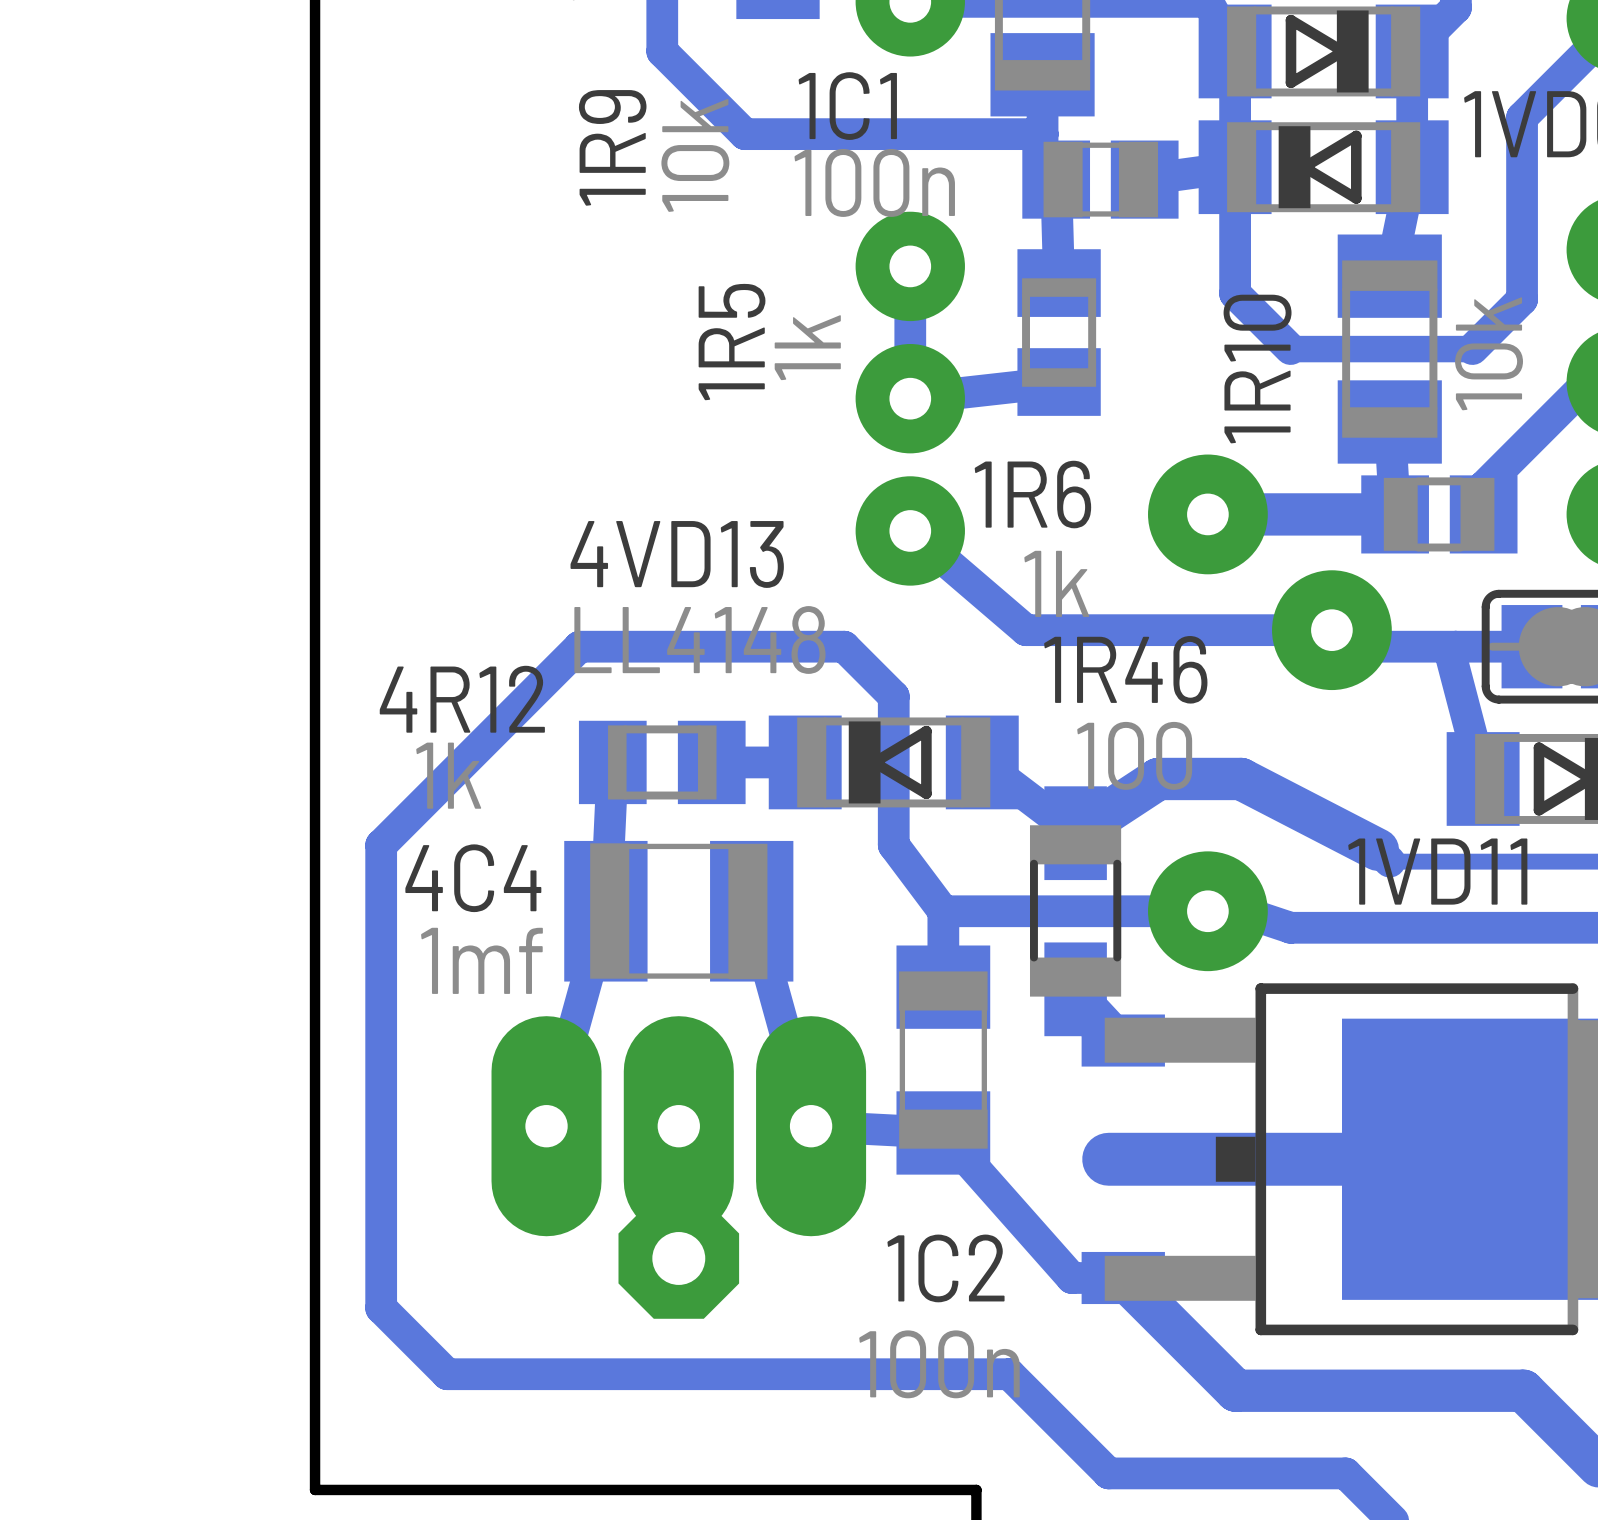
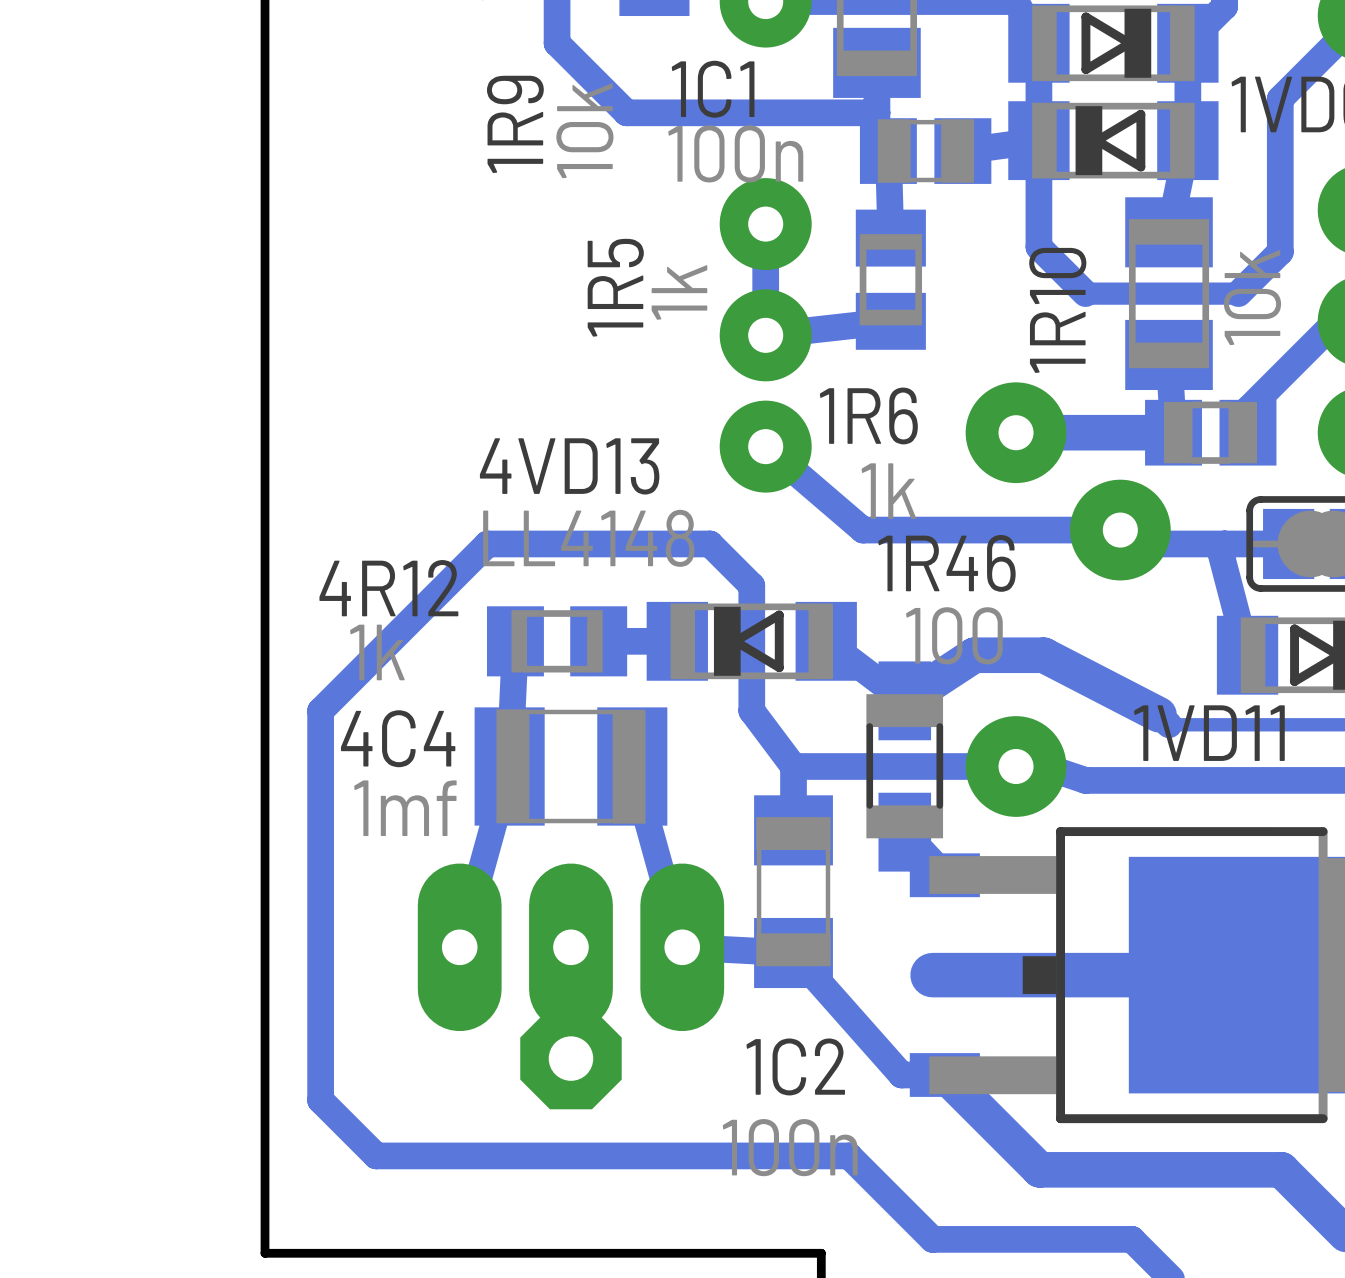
part footprint: [491, 1016, 867, 1237] -> [417, 863, 725, 1032]

